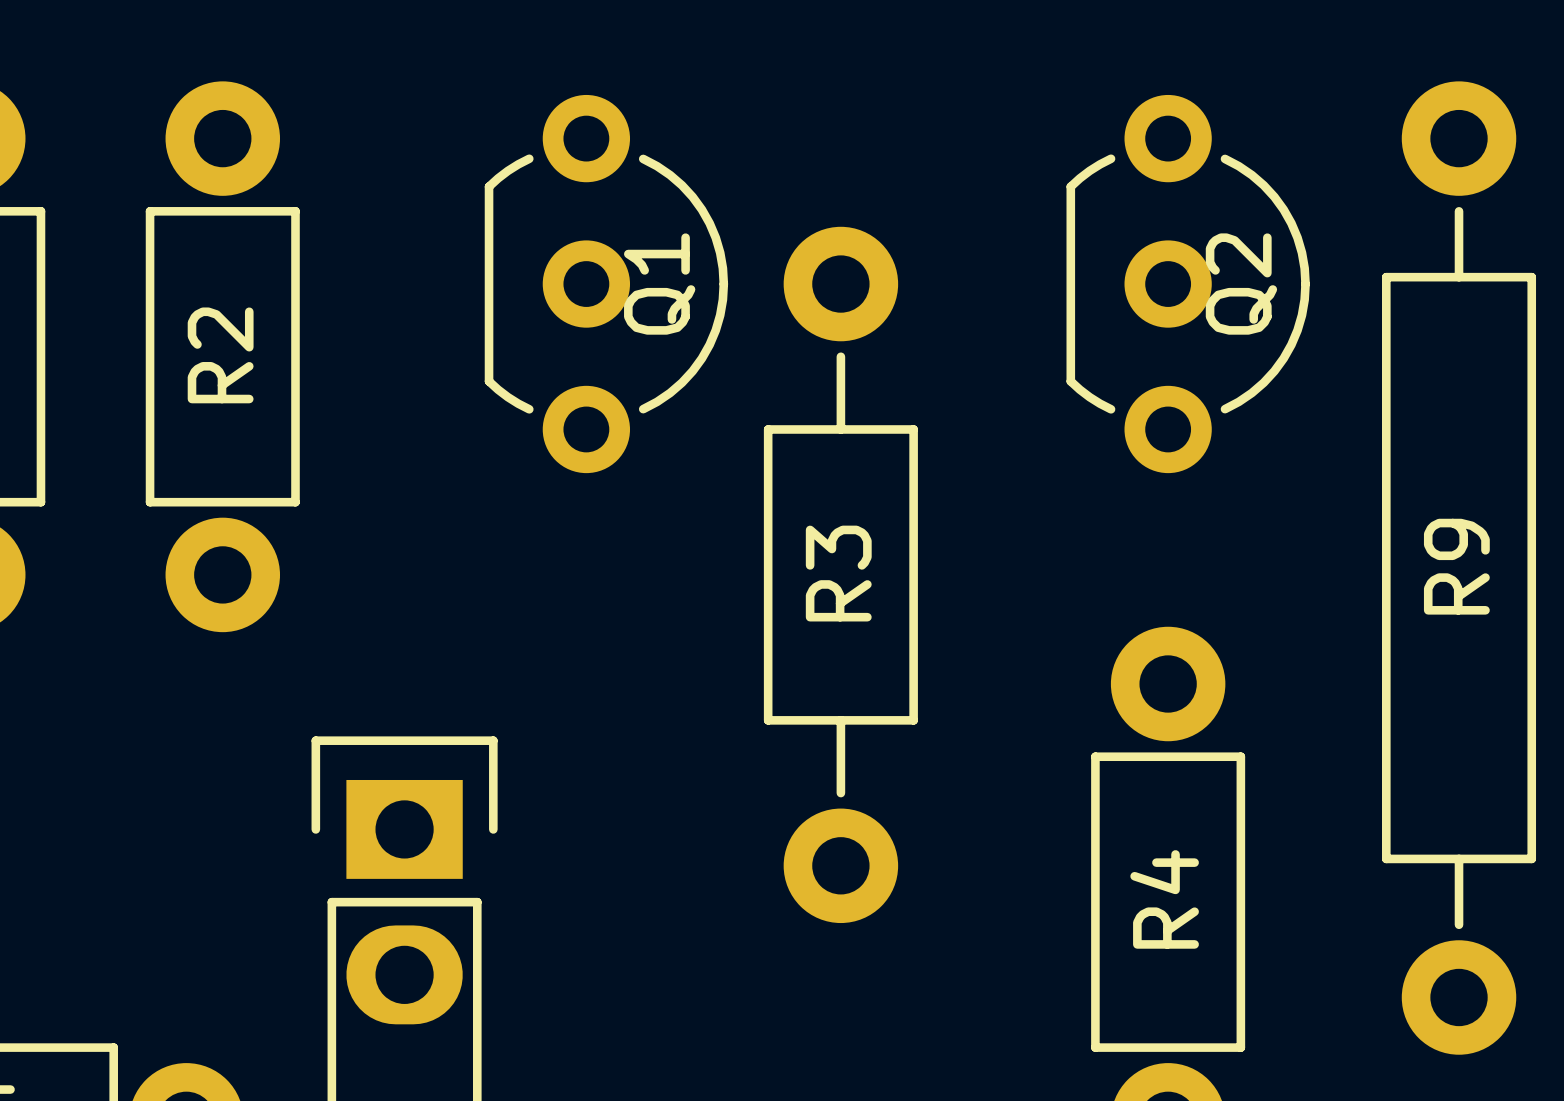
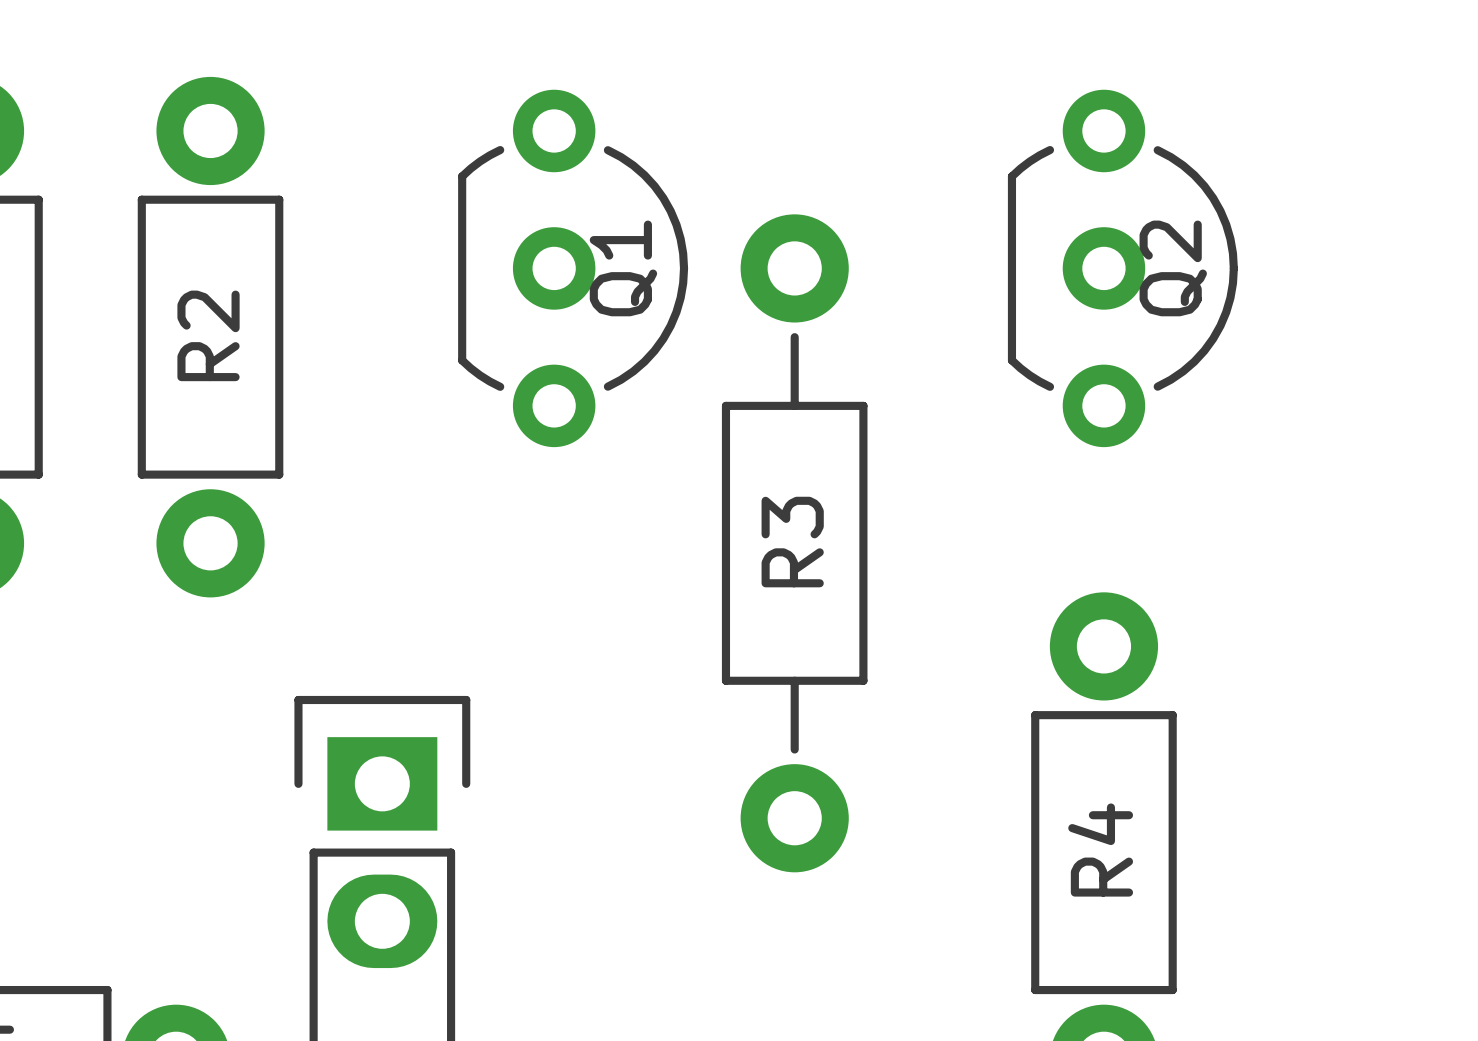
R9: (1459, 568) -> none

